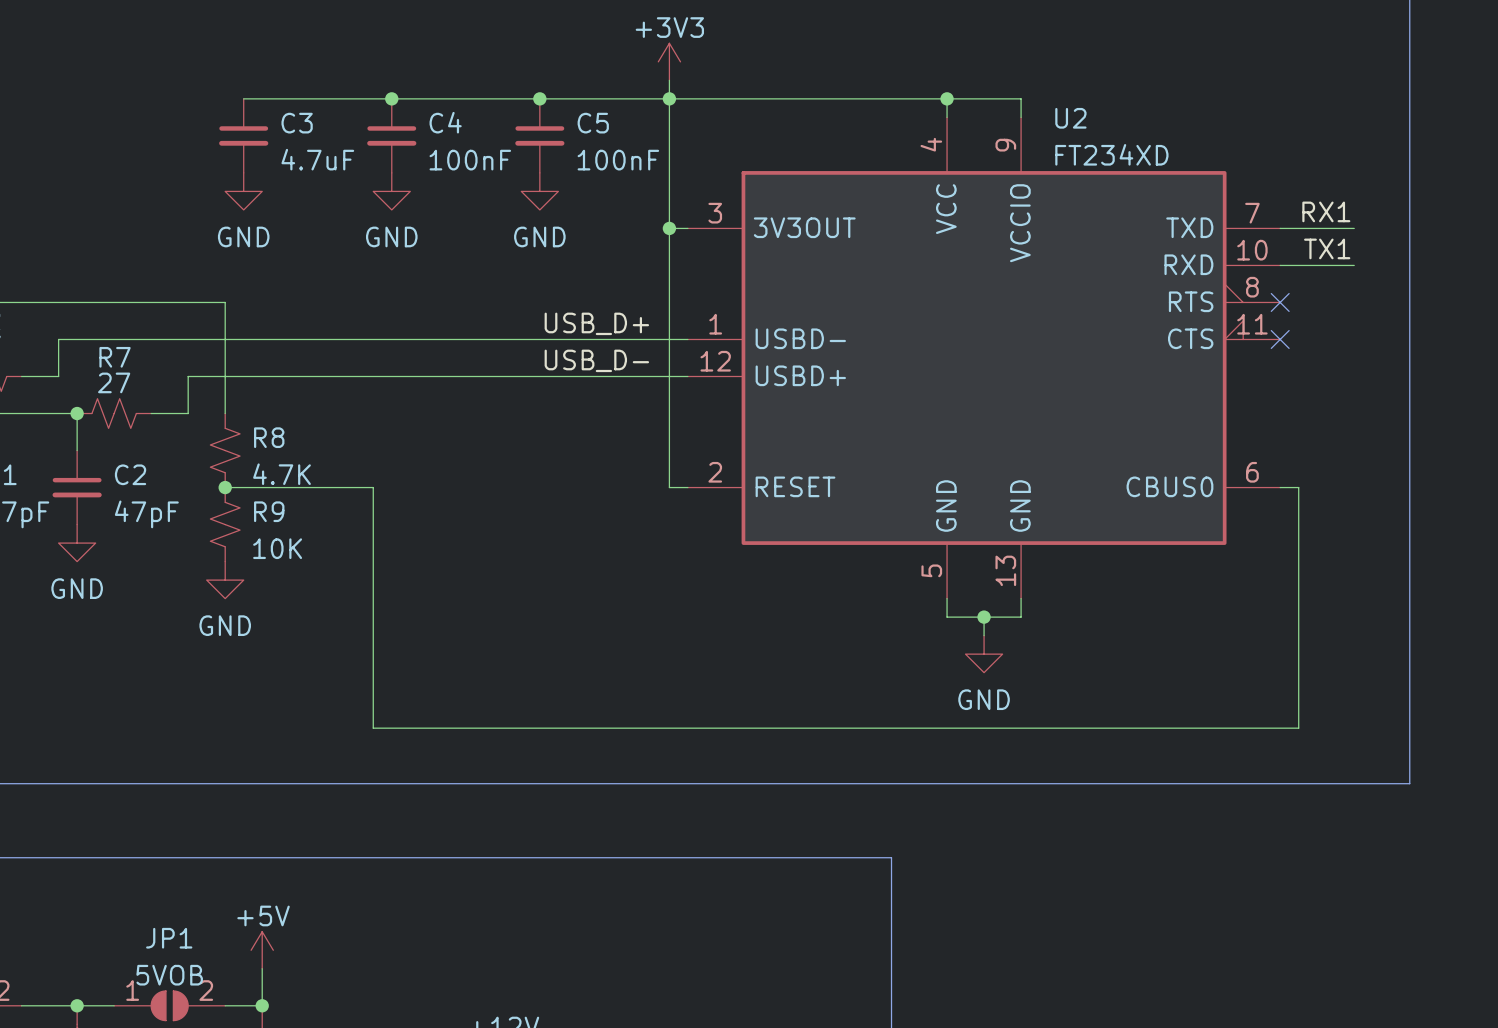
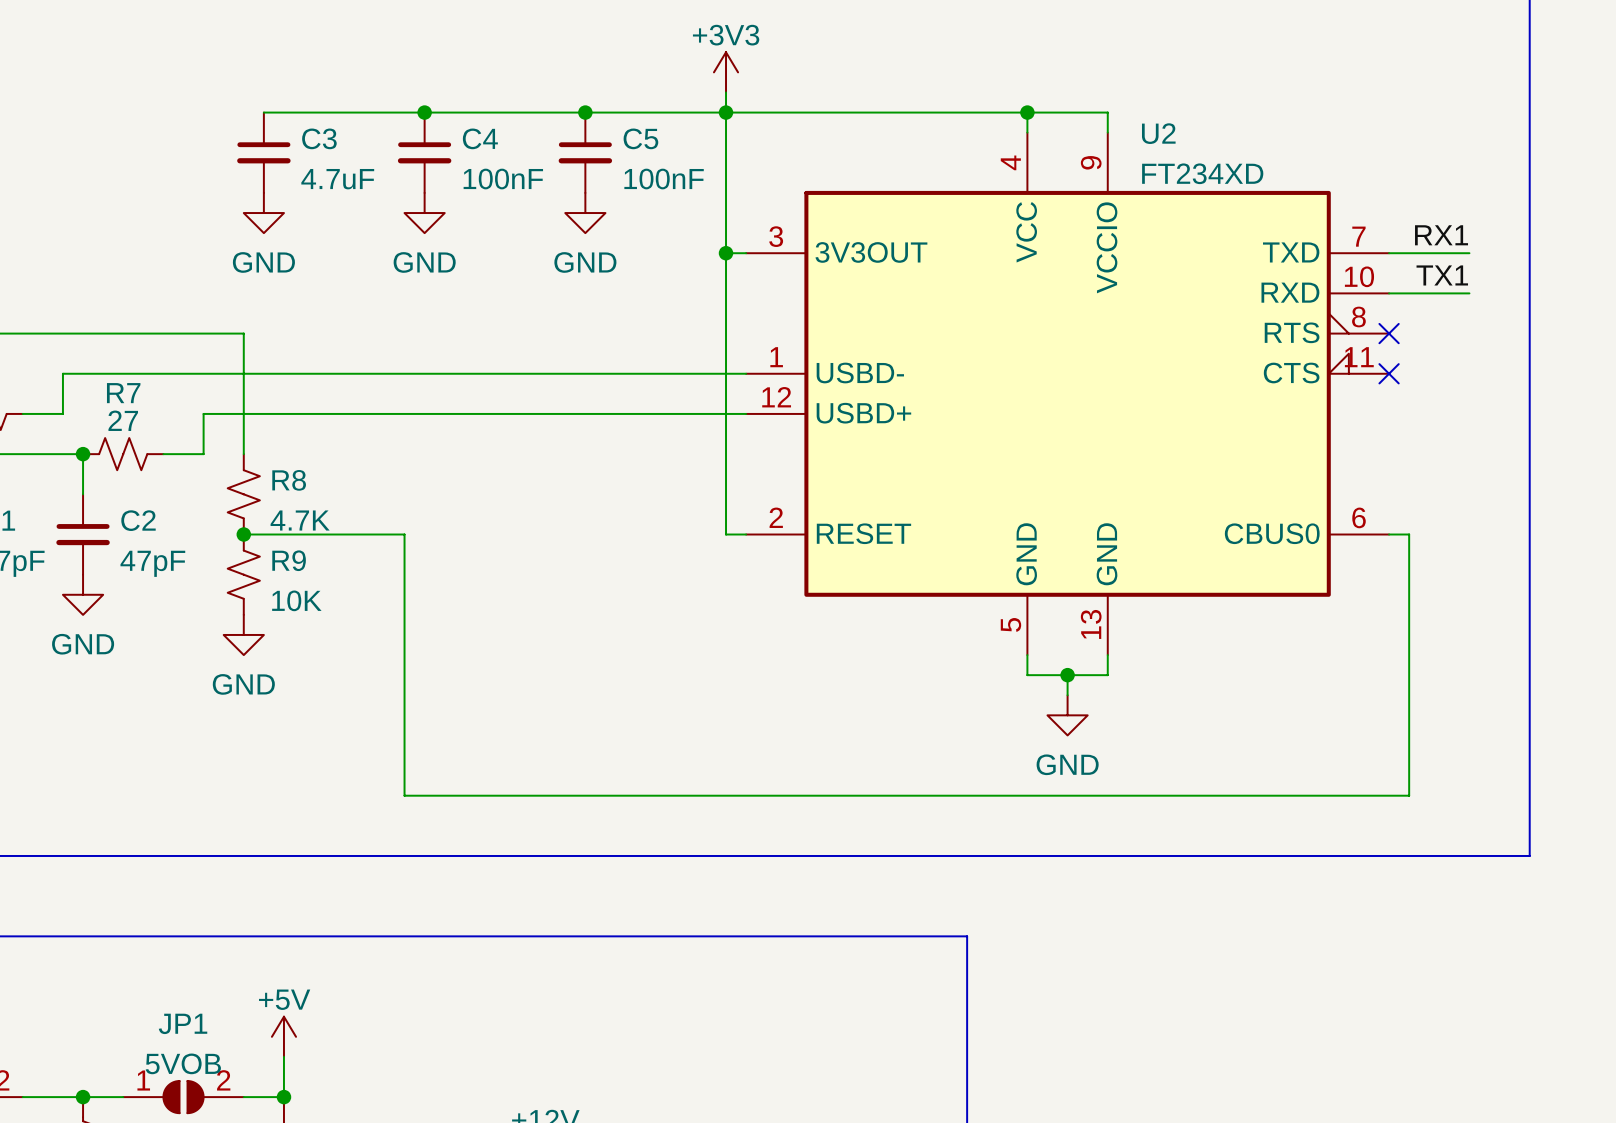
label: USB_D+ (596, 323) -> none
label: USB_D- (596, 360) -> none

